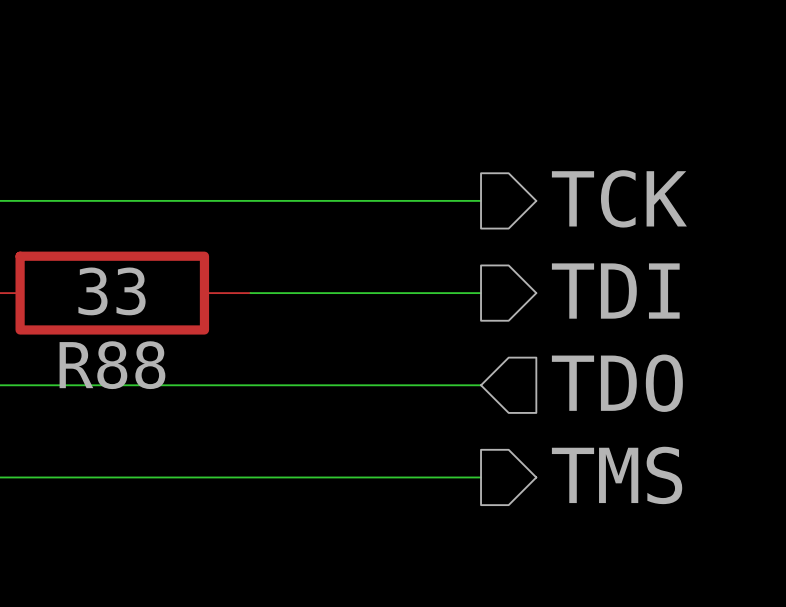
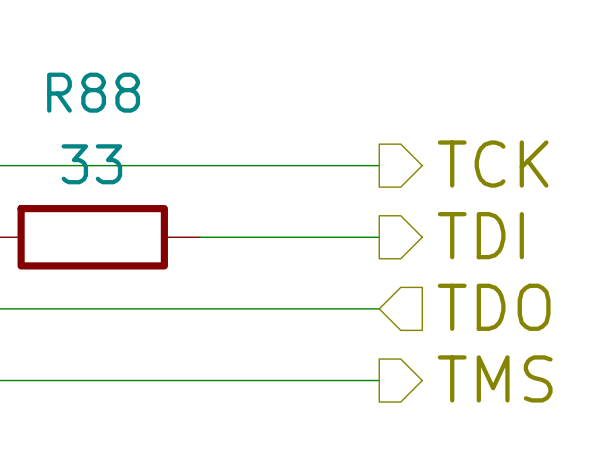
R88 value position: 33 (112, 291) -> 33 (91, 164)
R88 name position: R88 (112, 365) -> R88 (93, 92)

